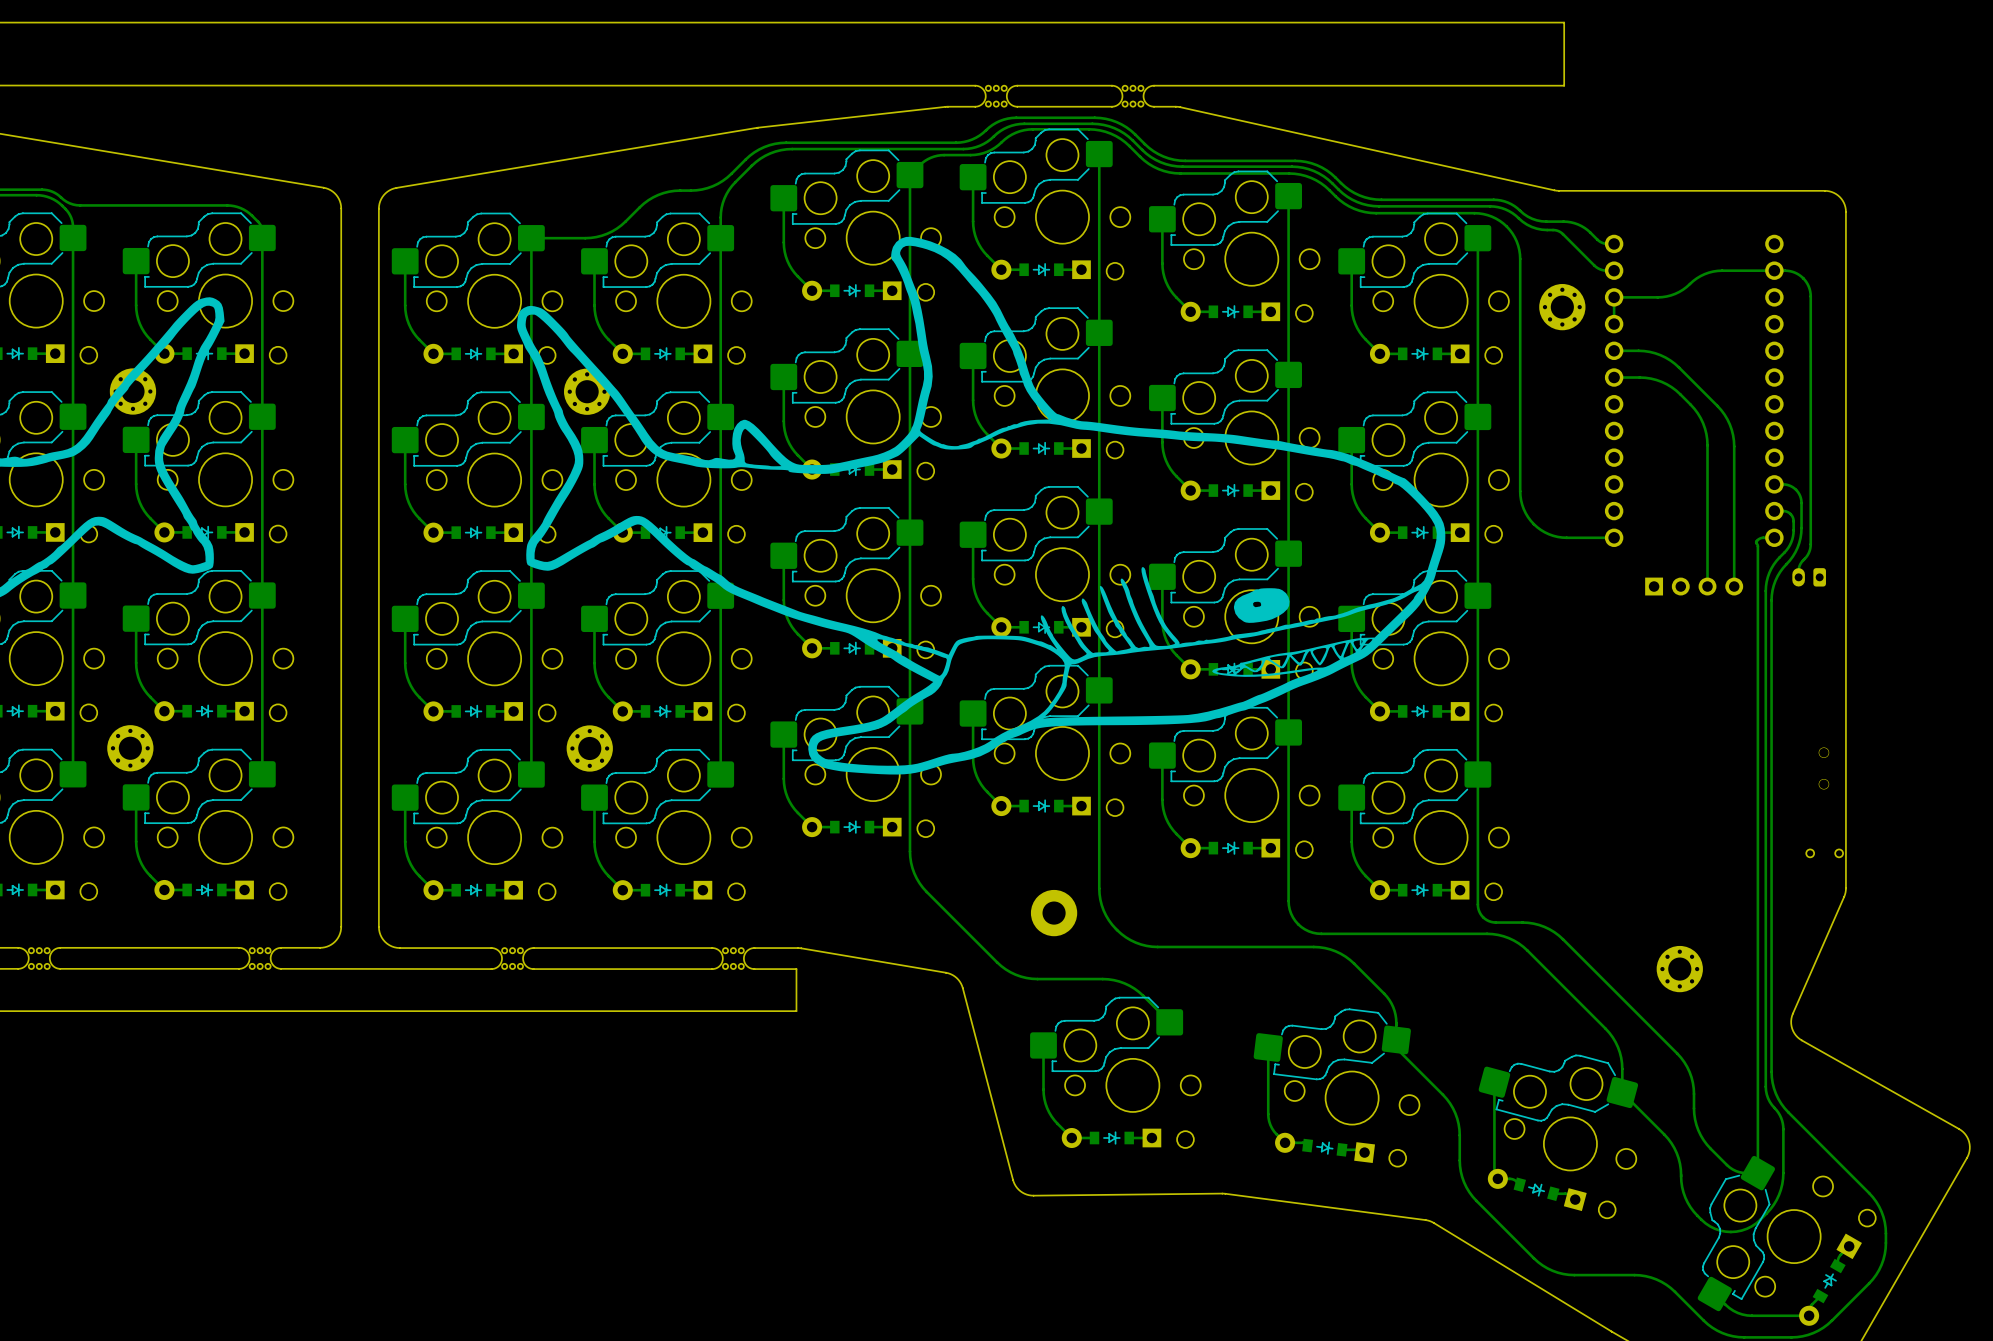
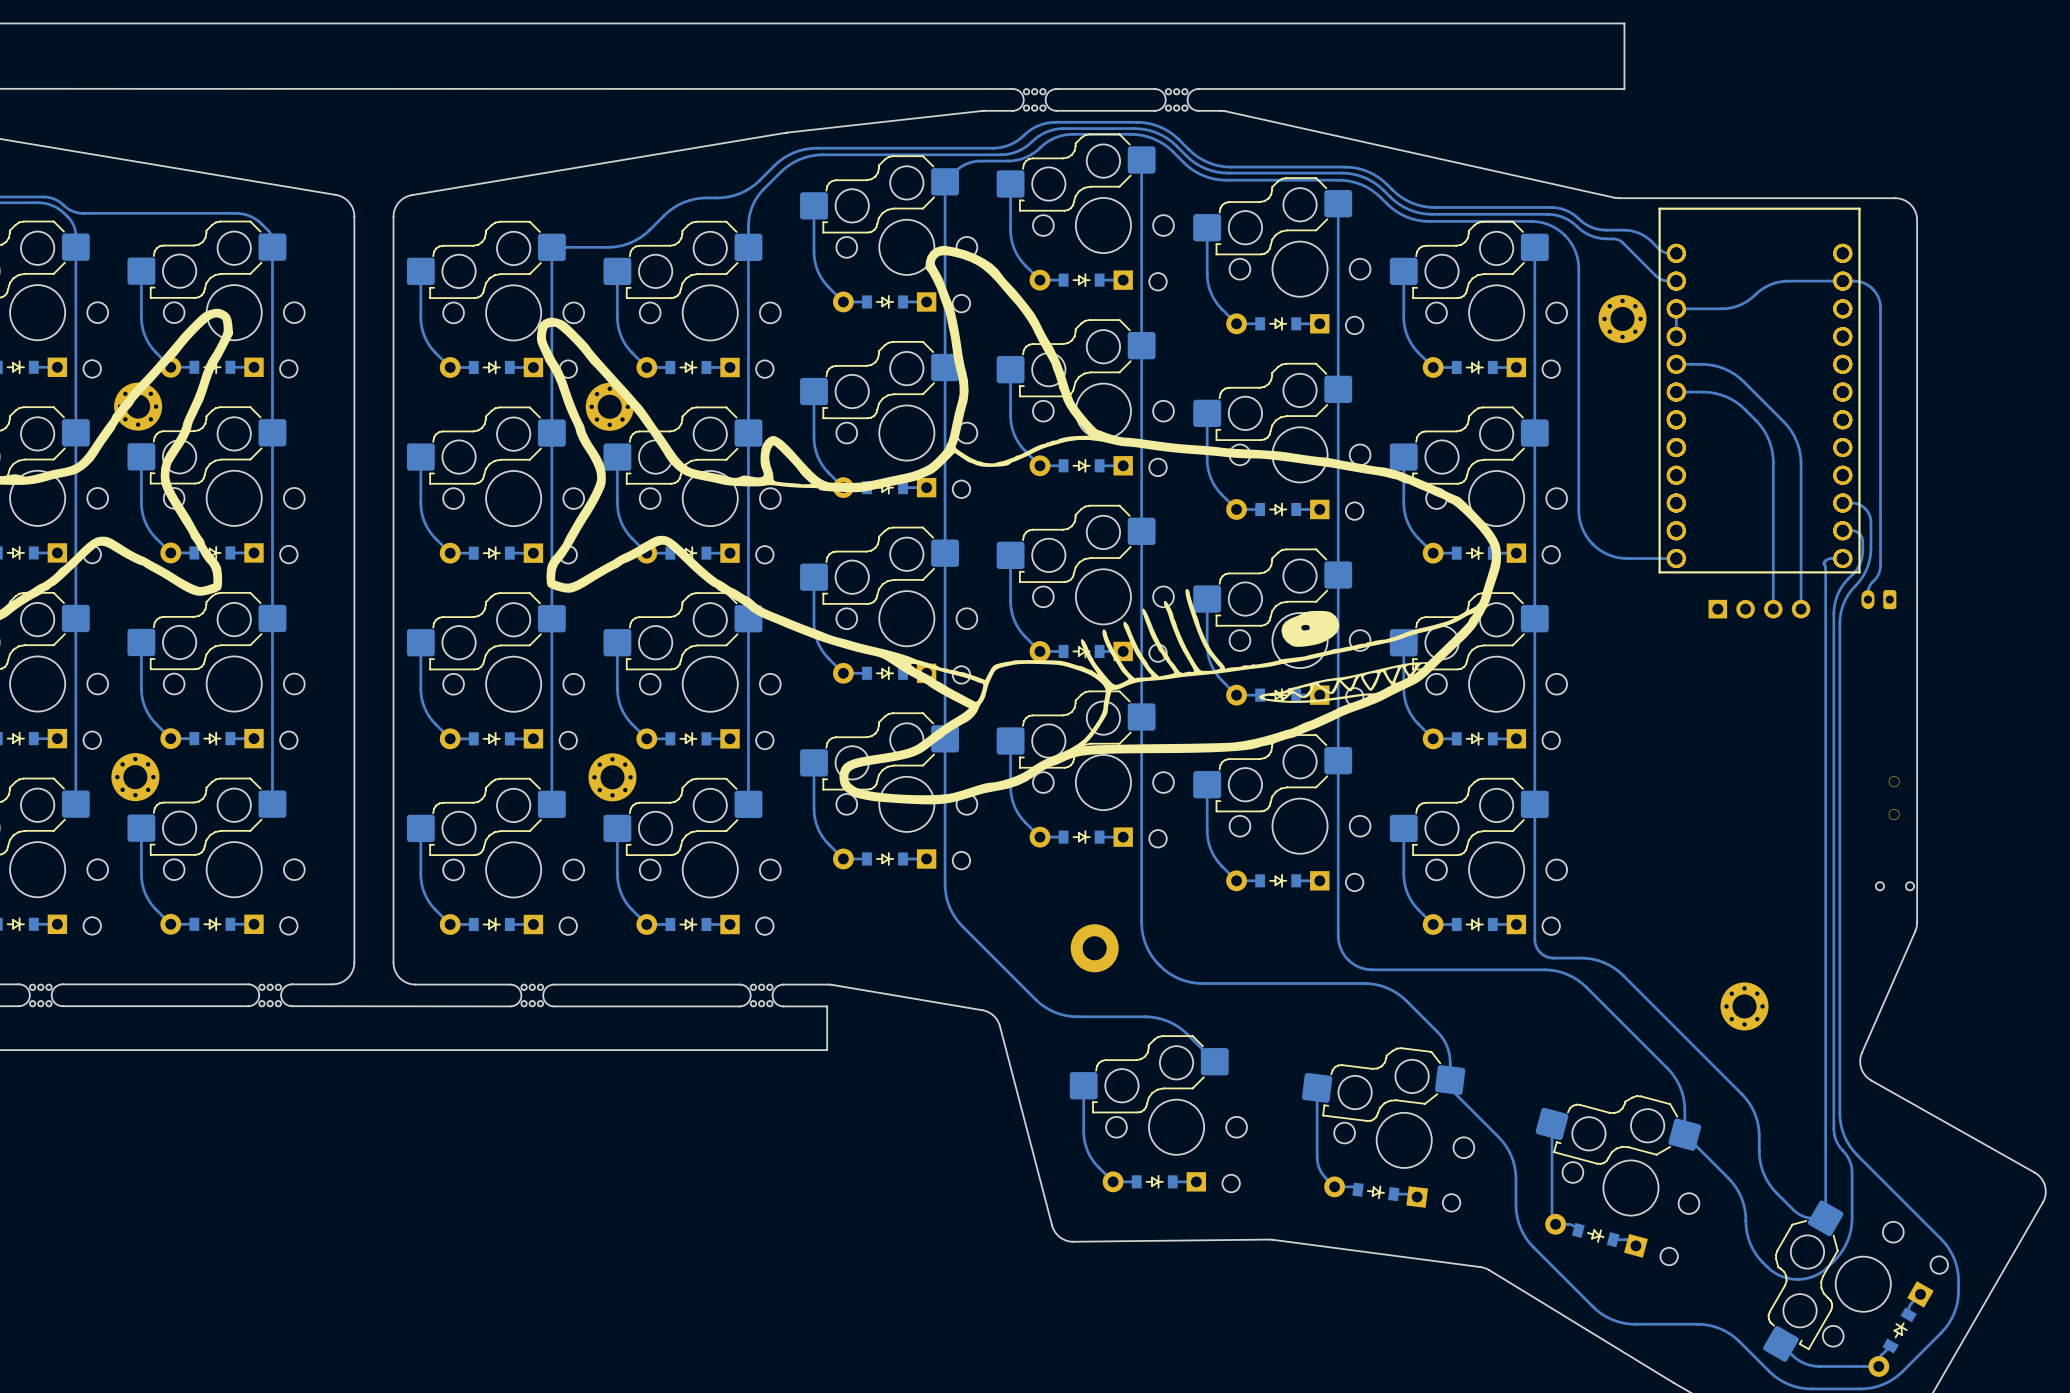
part: none -> (1759, 390)

